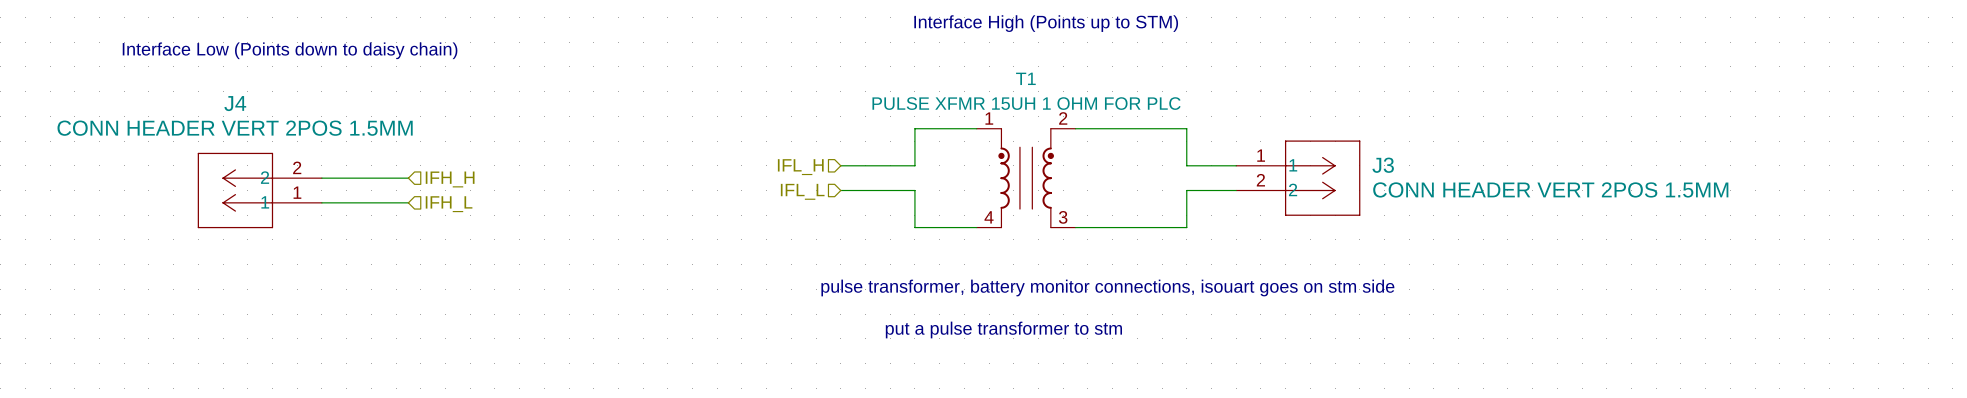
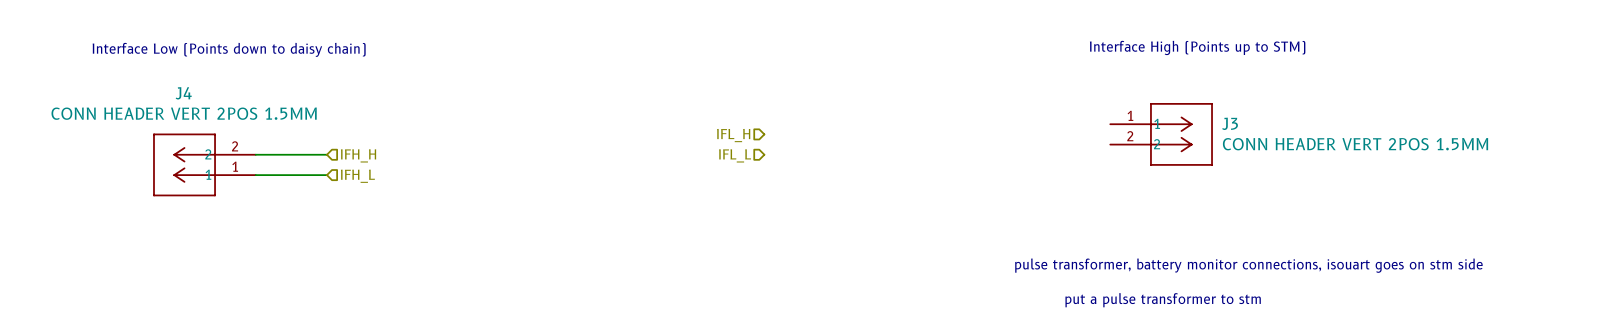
text: Interface High (Points up to STM) (1046, 23) -> none
text: none -> Interface High (Points up to STM) (1197, 47)
wire: (976, 128) (914, 128) (914, 165) (840, 165) -> none
wire: (1075, 128) (1186, 128) (1186, 165) (1236, 165) -> none
hierarchical label position: IFL_H (800, 167) -> IFL_H (733, 135)
T1: PULSE XFMR 15UH 1 OHM FOR PLC (1026, 178) -> none
J3 position: (1298, 178) -> (1161, 134)
wire: (840, 190) (914, 190) (914, 227) (976, 227) -> none
wire: (1236, 190) (1186, 190) (1186, 227) (1075, 227) -> none
hierarchical label position: IFL_L (802, 191) -> IFL_L (735, 155)
text: pulse transformer, battery monitor connections, isouart goes on stm side (1107, 287) -> none
text: none -> pulse transformer, battery monitor connections, isouart goes on stm side (1248, 265)
text: put a pulse transformer to stm (1003, 329) -> none
text: none -> put a pulse transformer to stm (1163, 300)

